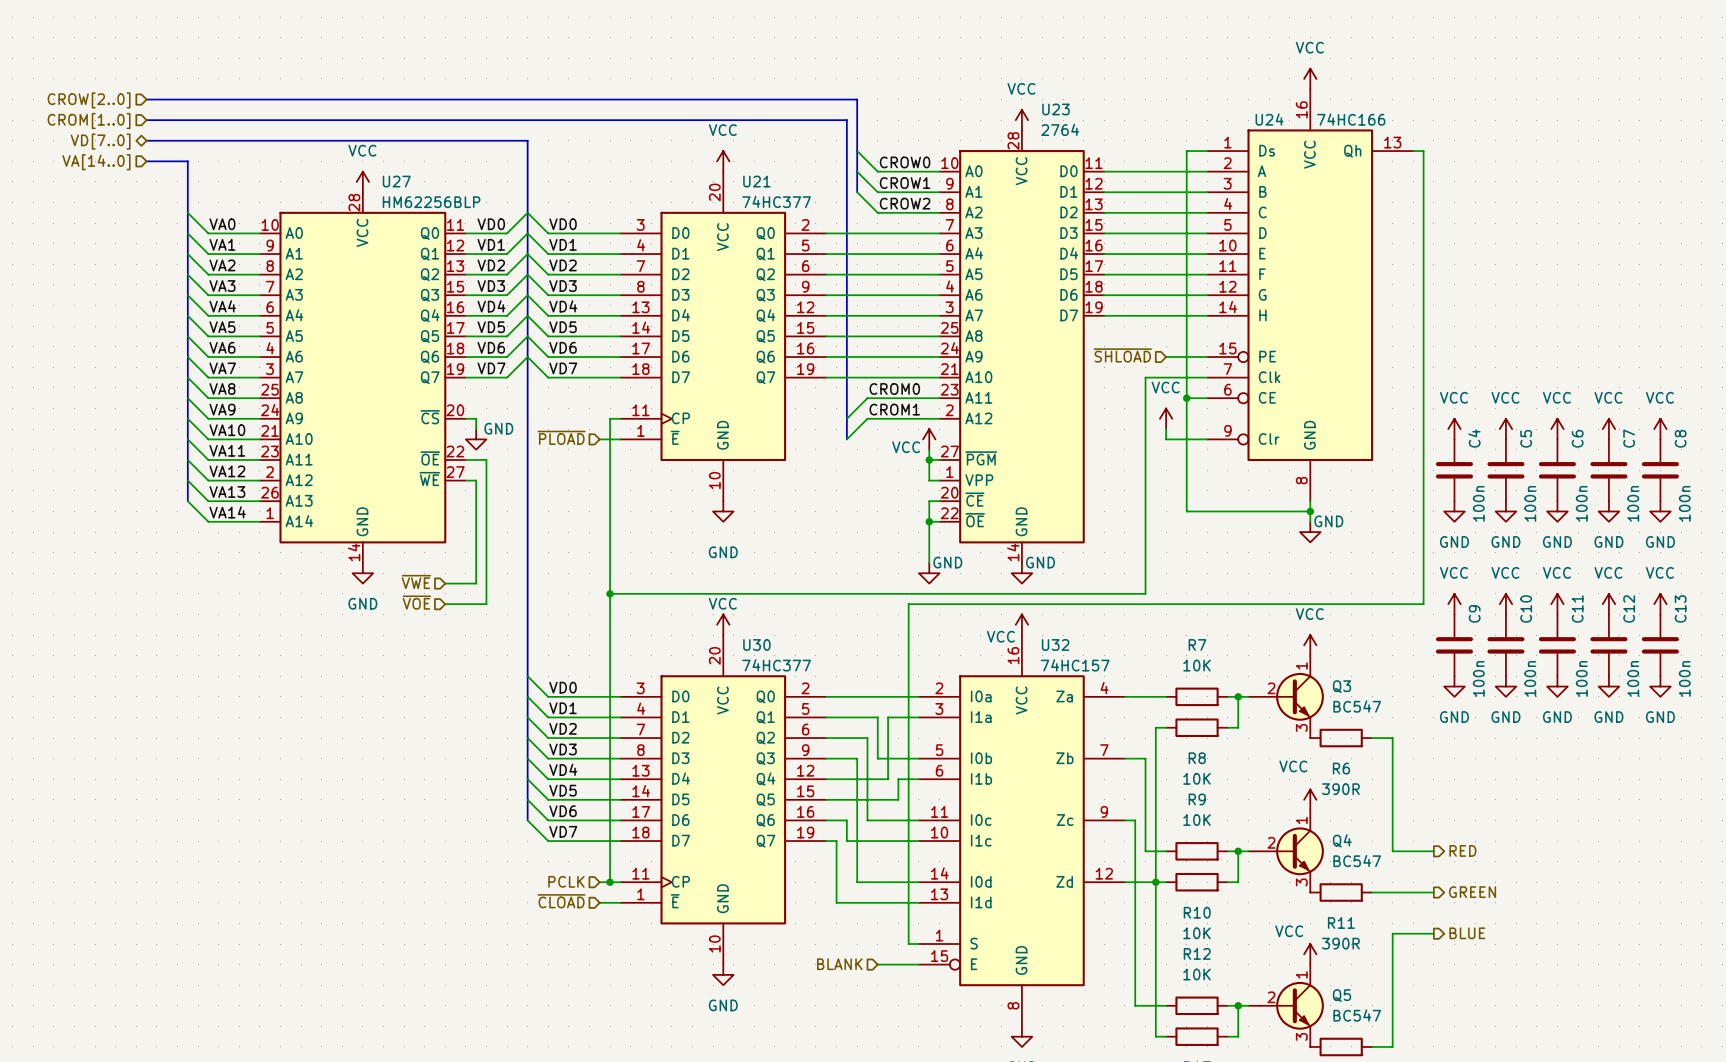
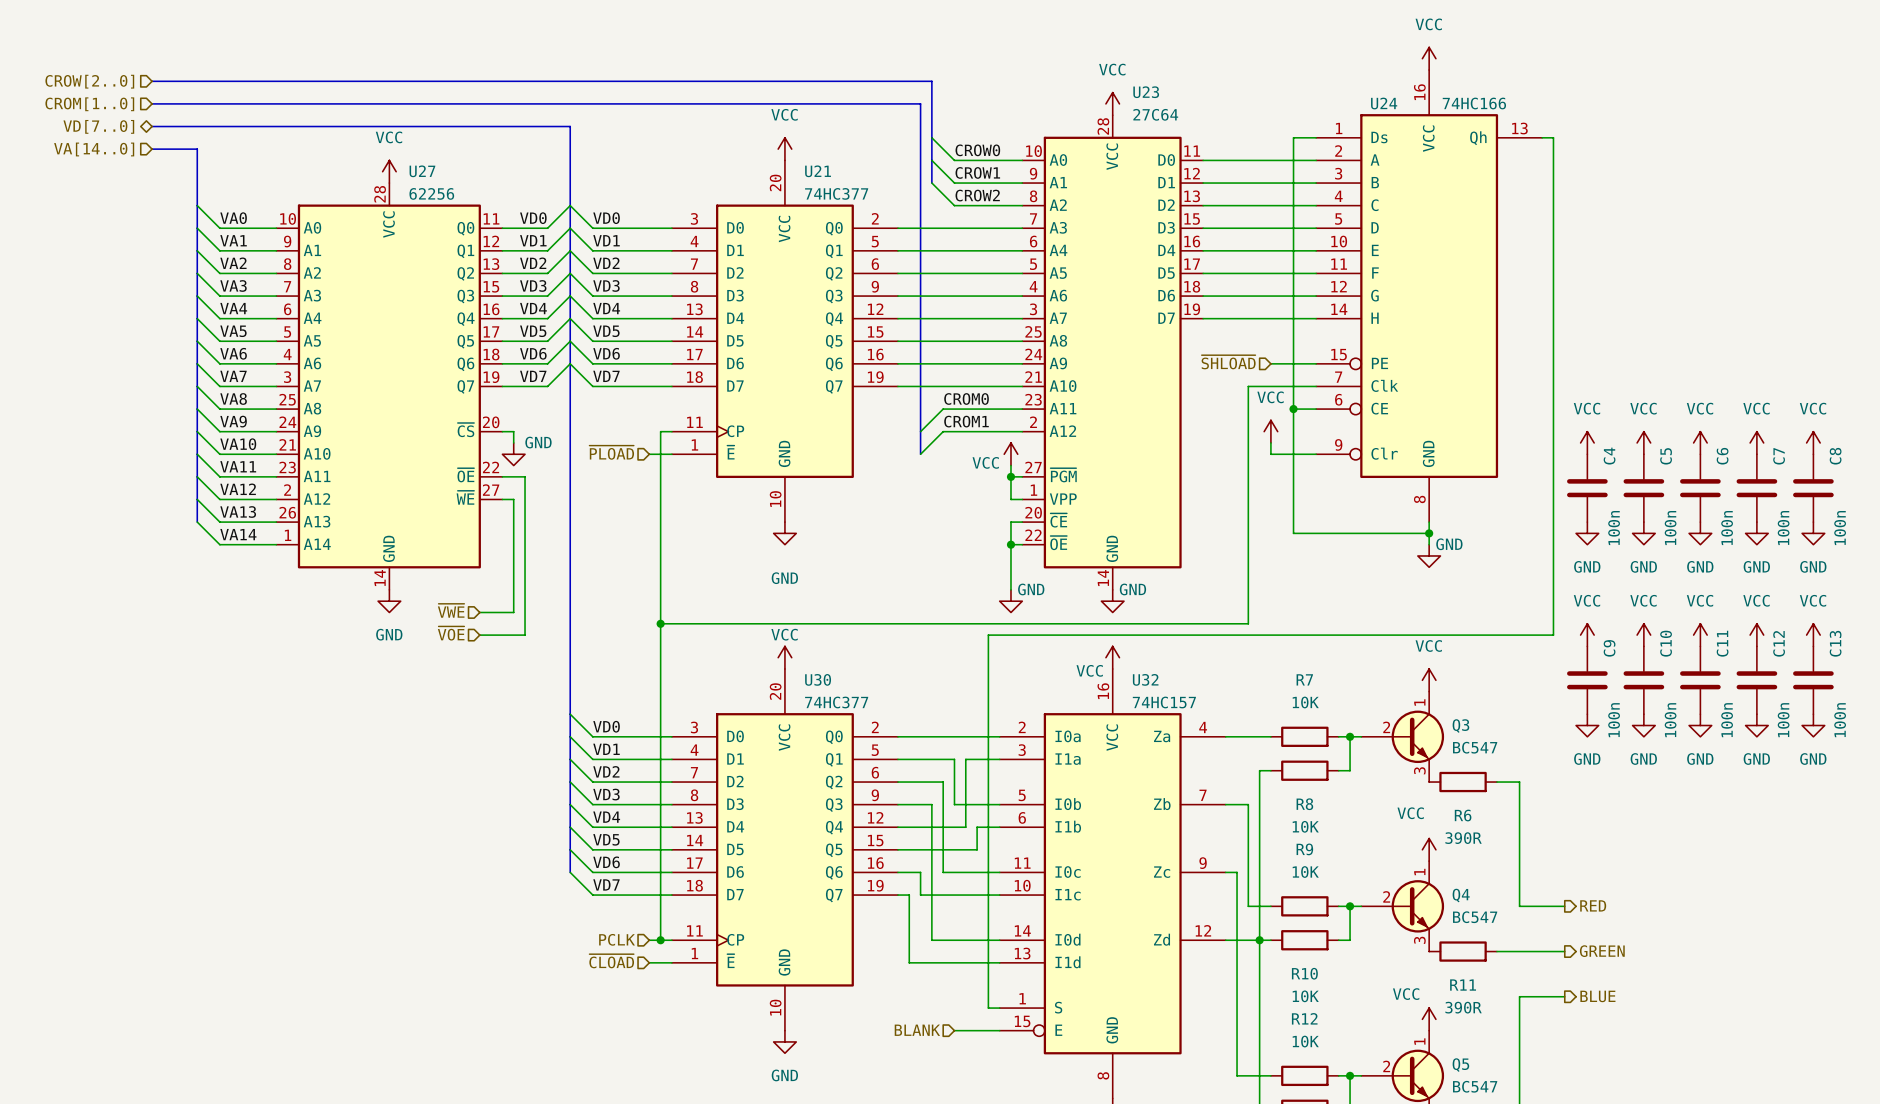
U23 value: 2764 (1060, 129) -> 27C64 (1155, 114)
U27 value: HM62256BLP (431, 202) -> 62256 (431, 193)

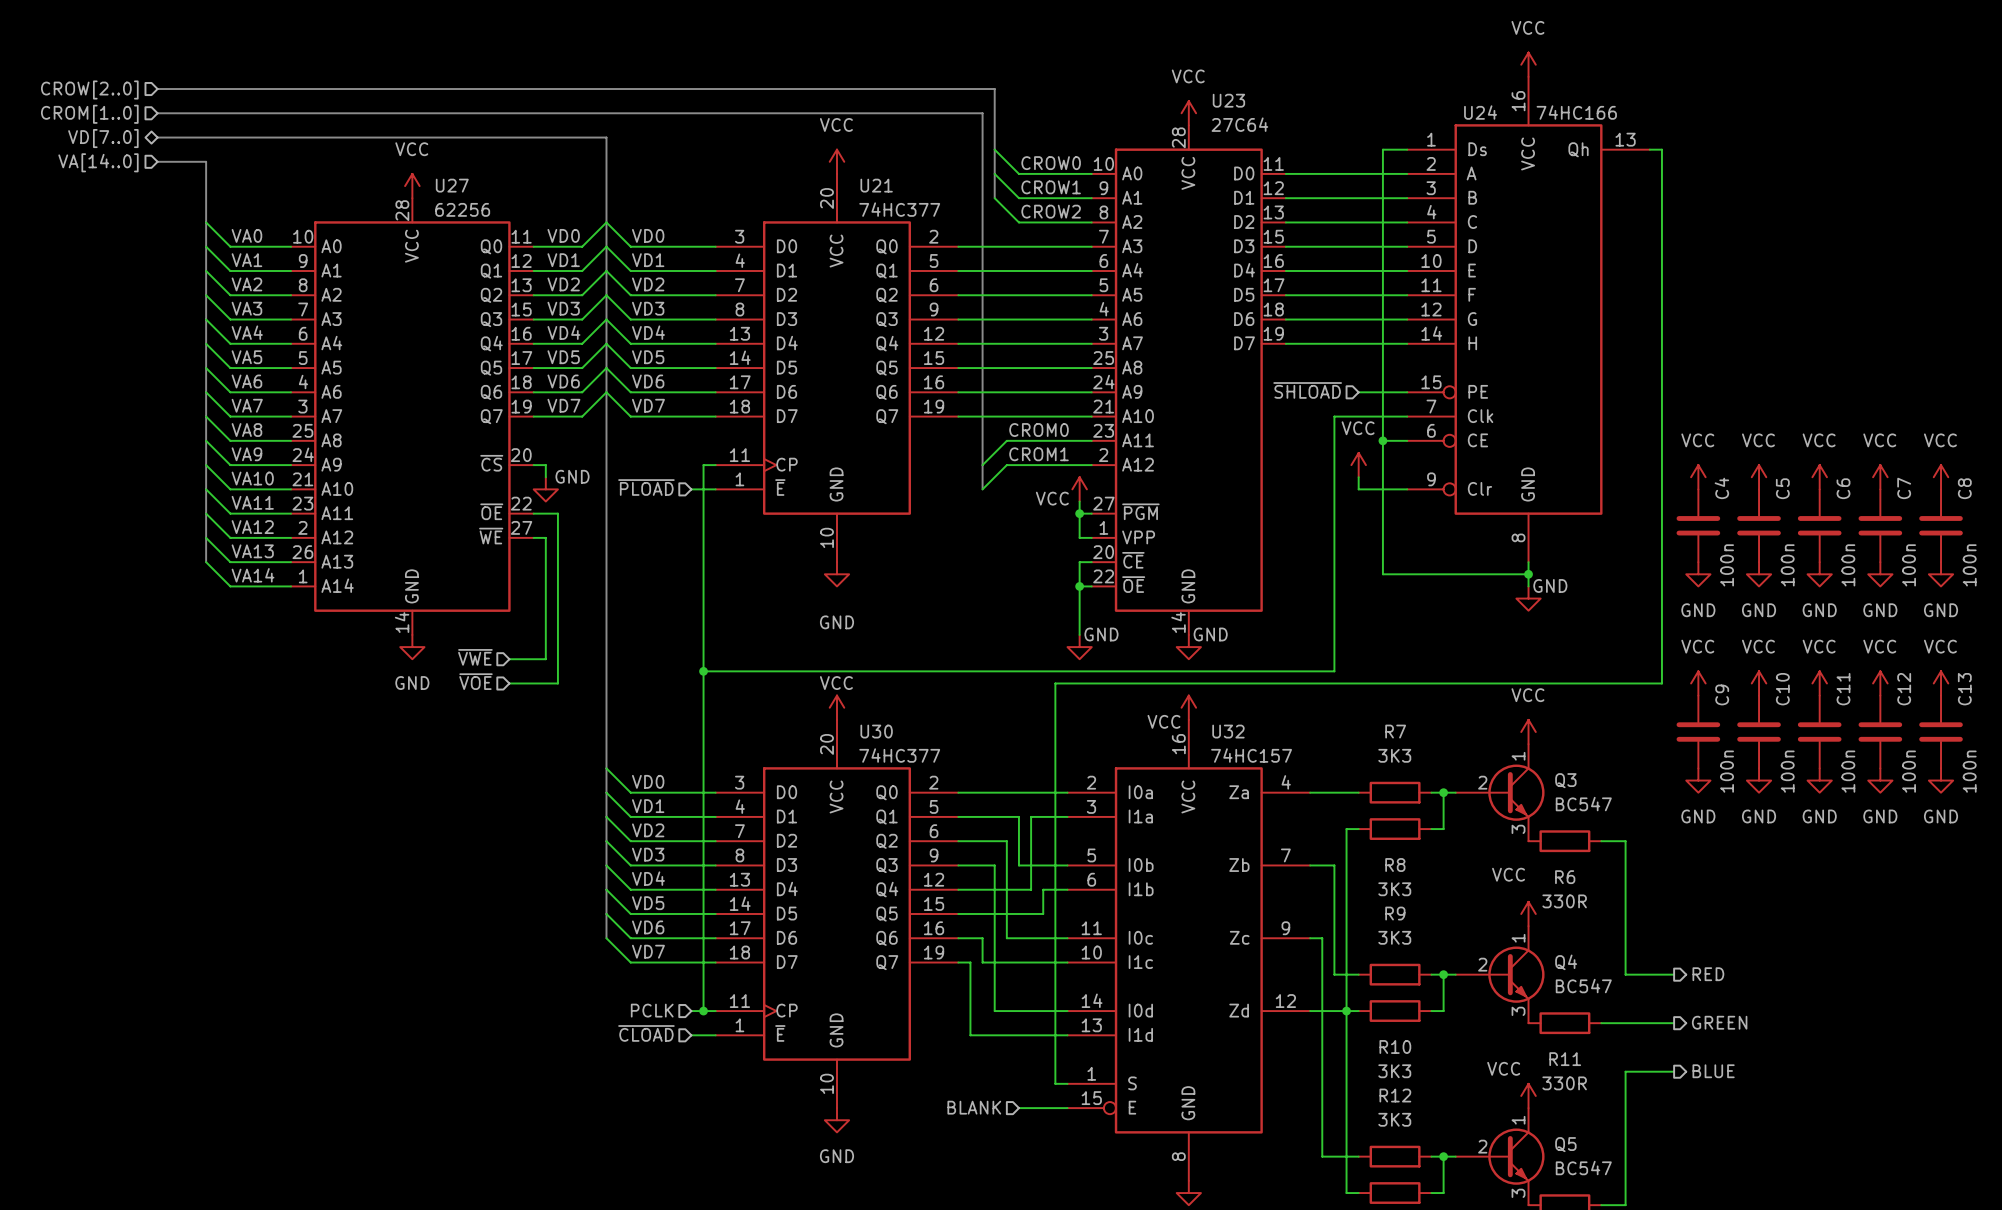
R7 value: 10K (1305, 702) -> 3K3 (1394, 755)
R8 value: 10K (1305, 826) -> 3K3 (1394, 889)
R6 value: 390R (1463, 838) -> 330R (1564, 901)
R9 value: 10K (1305, 872) -> 3K3 (1394, 937)
R10 value: 10K (1305, 996) -> 3K3 (1394, 1071)
R11 value: 390R (1463, 1007) -> 330R (1564, 1083)
R12 value: 10K (1305, 1041) -> 3K3 (1394, 1119)

